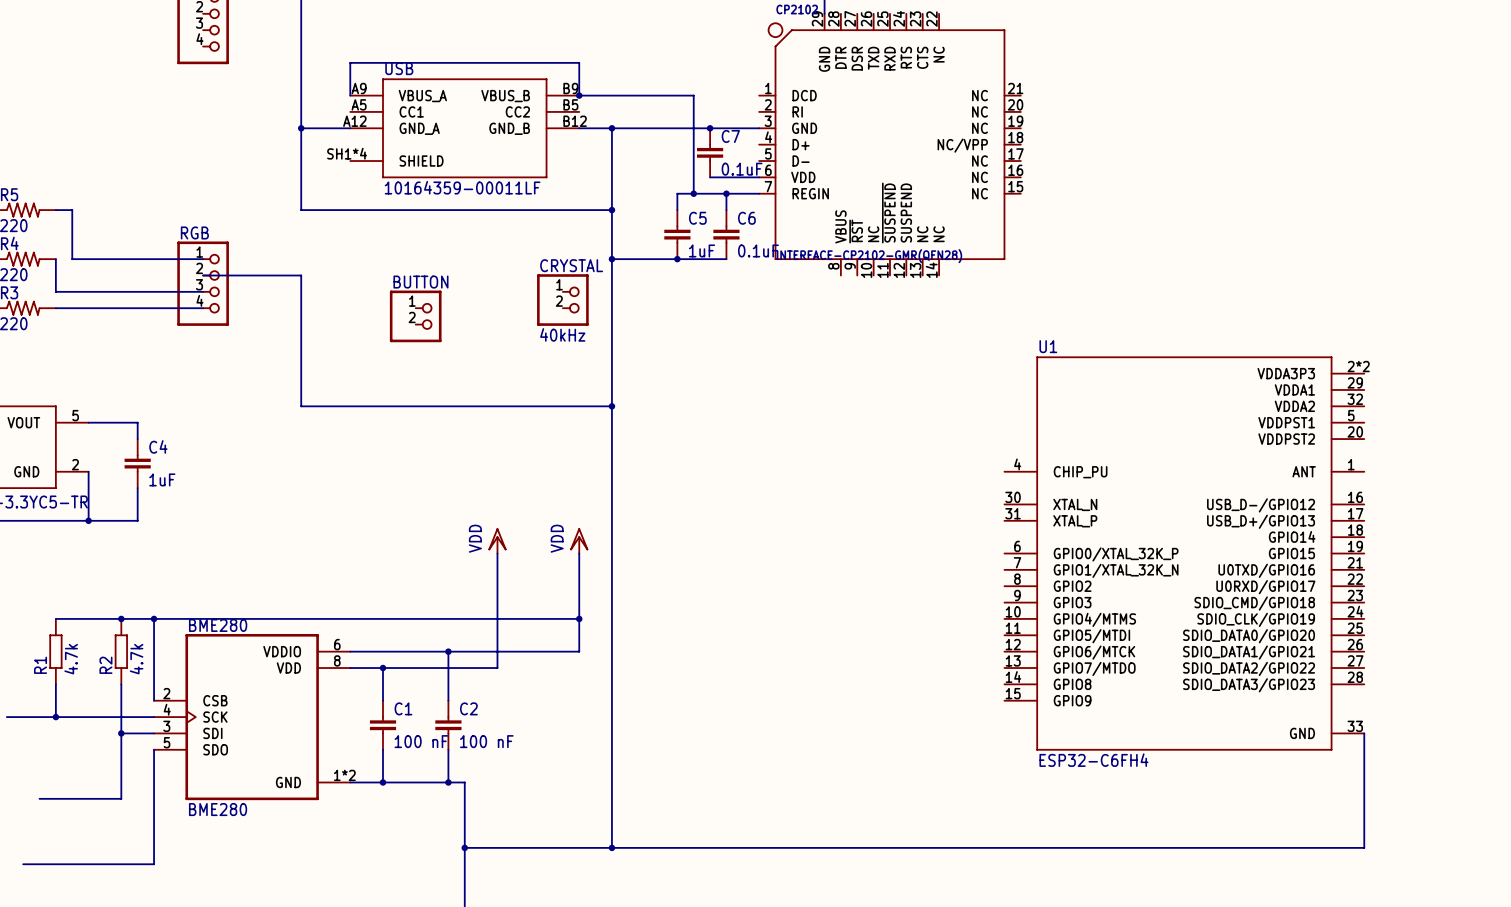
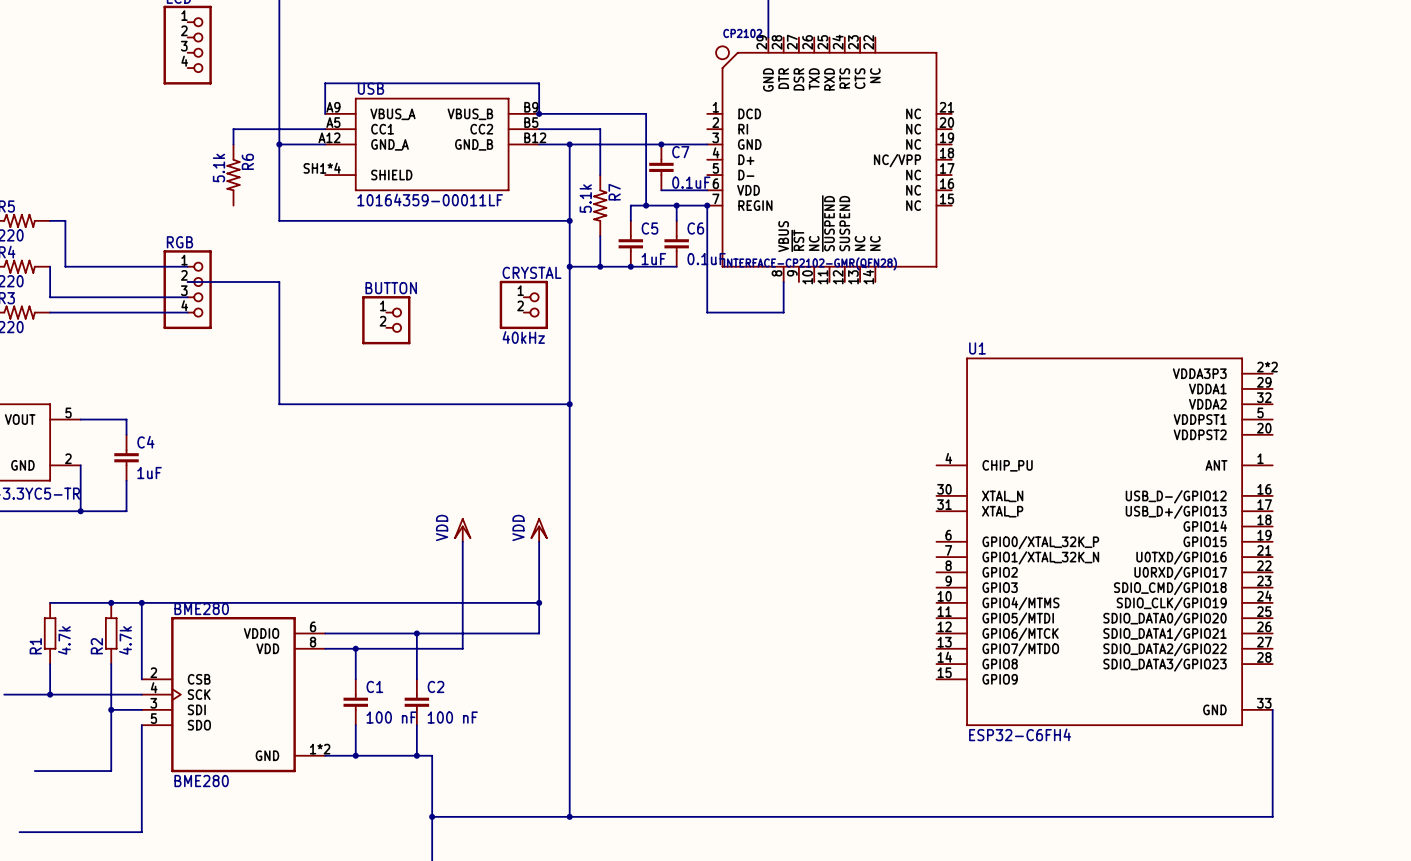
wire: none -> (325, 129) (233, 129) (233, 144)
wire: none -> (539, 129) (600, 129) (600, 175)
R6: none -> 5.1k (233, 175)
R7: none -> 5.1k (600, 205)
wire: none -> (707, 205) (707, 312) (783, 312) (783, 282)
junction: none -> (707, 205)
wire: none -> (600, 236) (600, 266)
junction: none -> (600, 266)

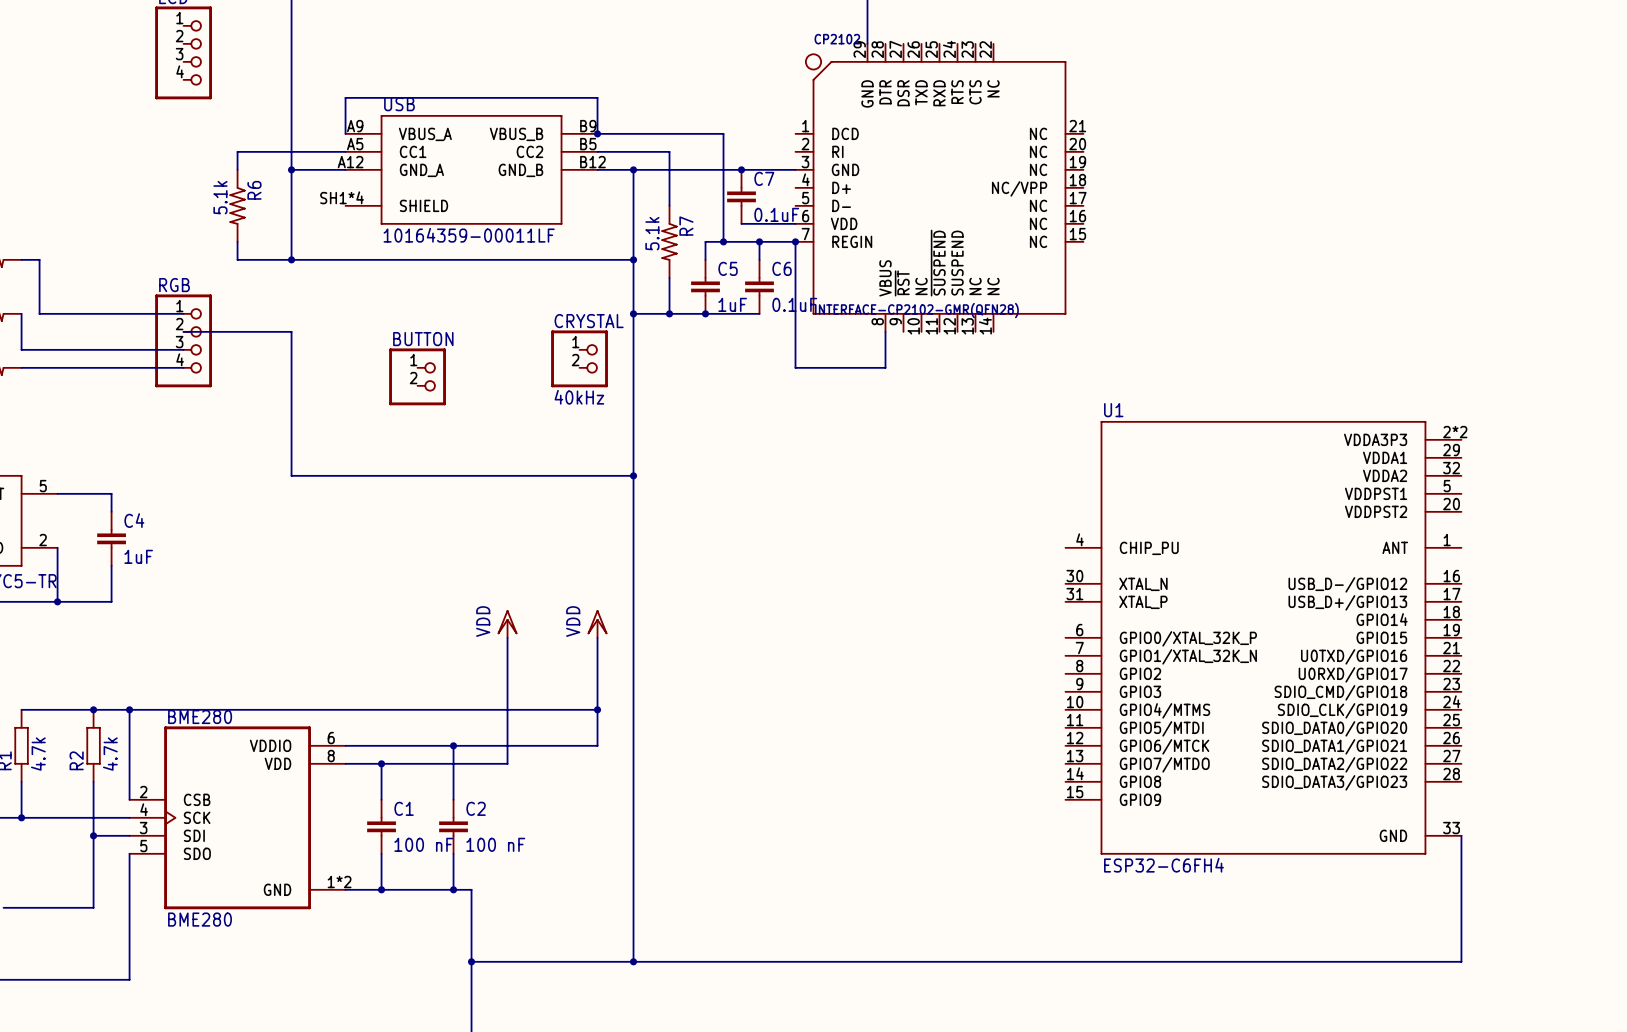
wire: none -> (237, 241) (237, 259) (291, 259)
junction: none -> (291, 259)

